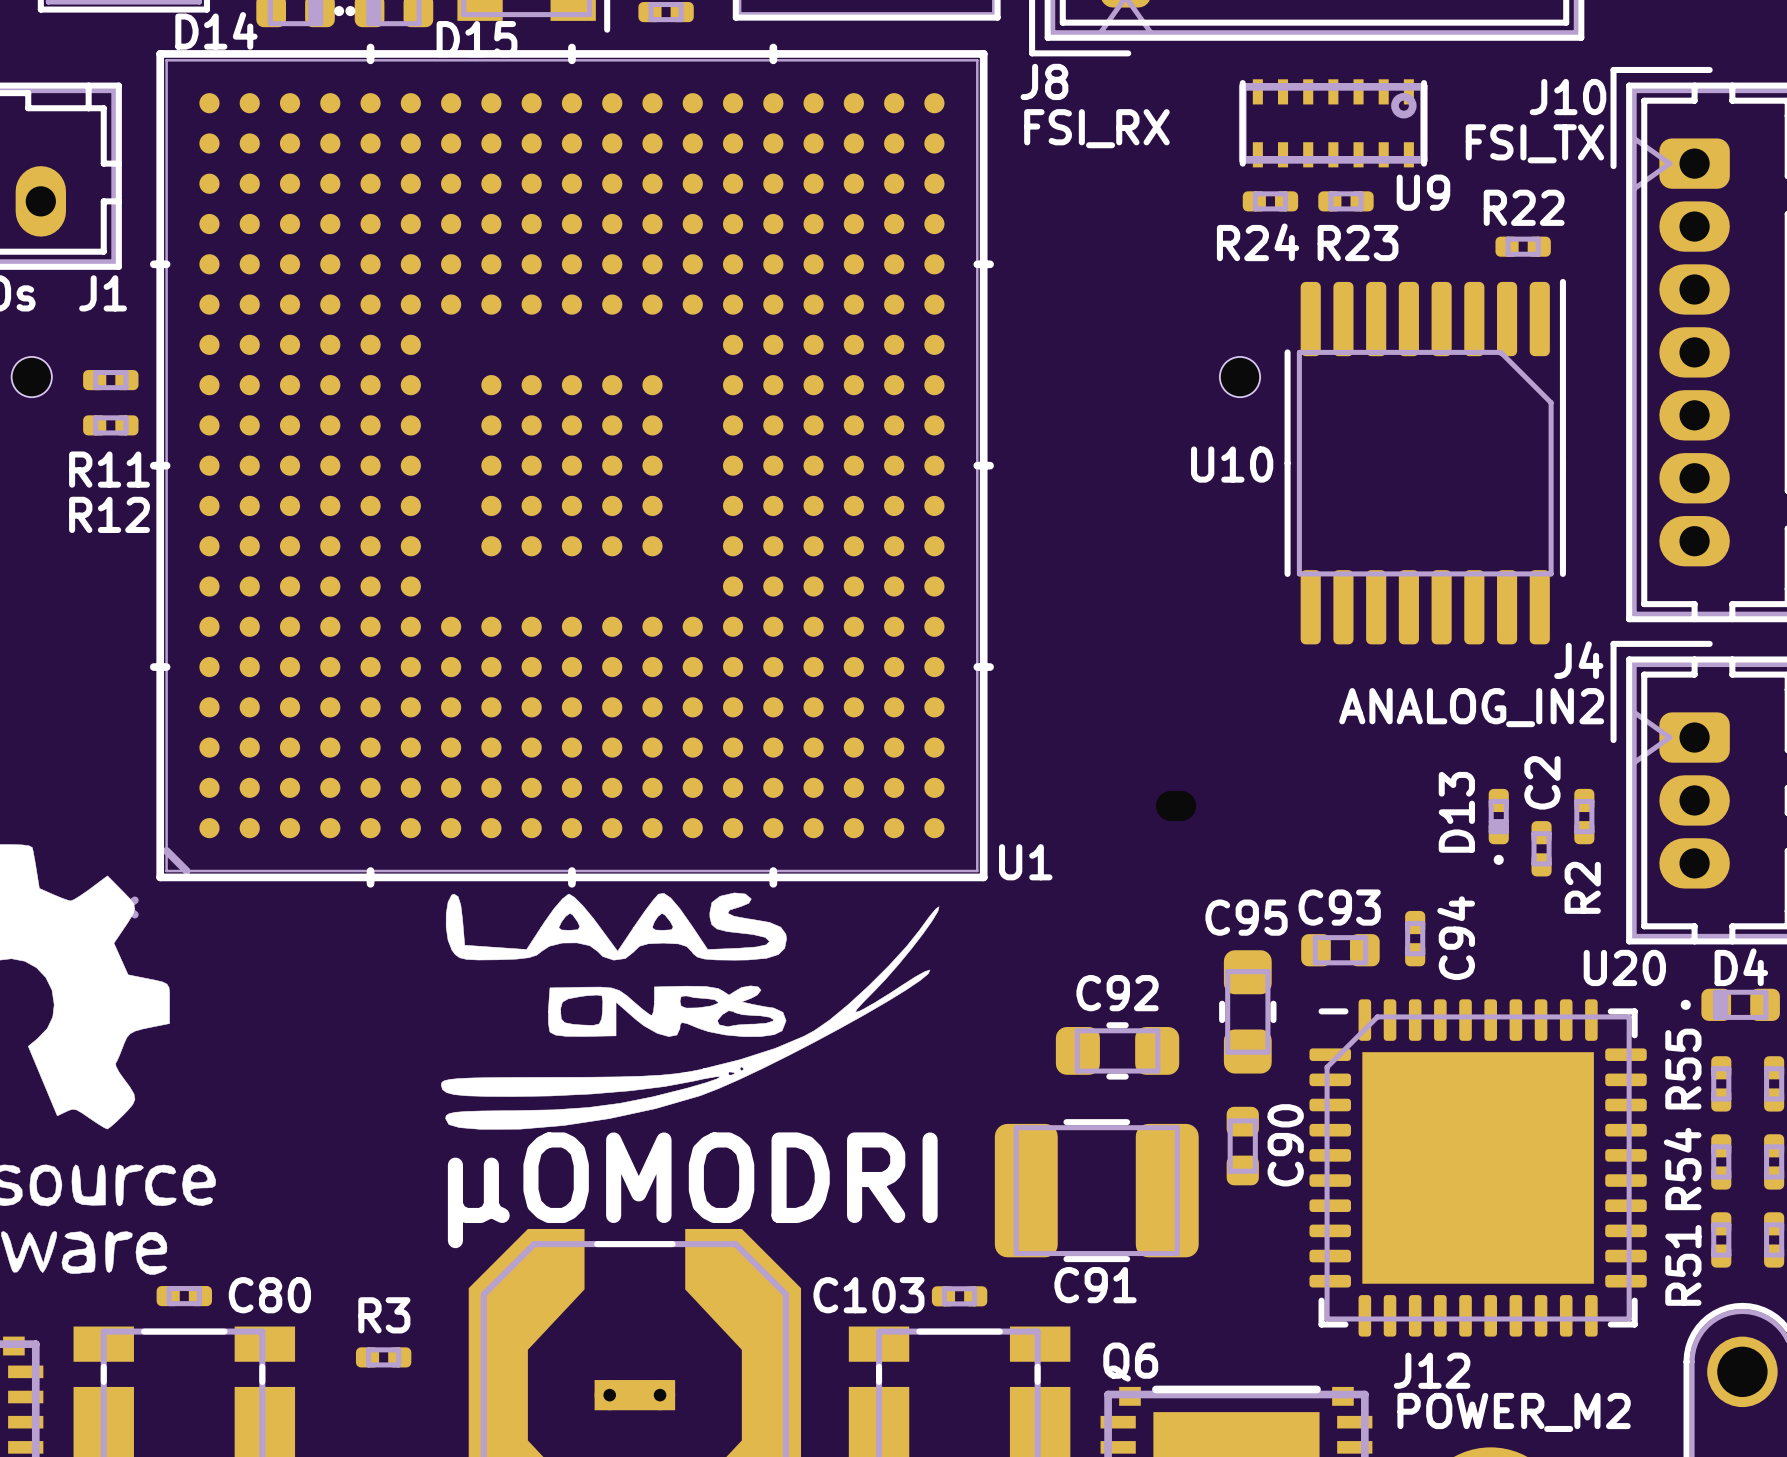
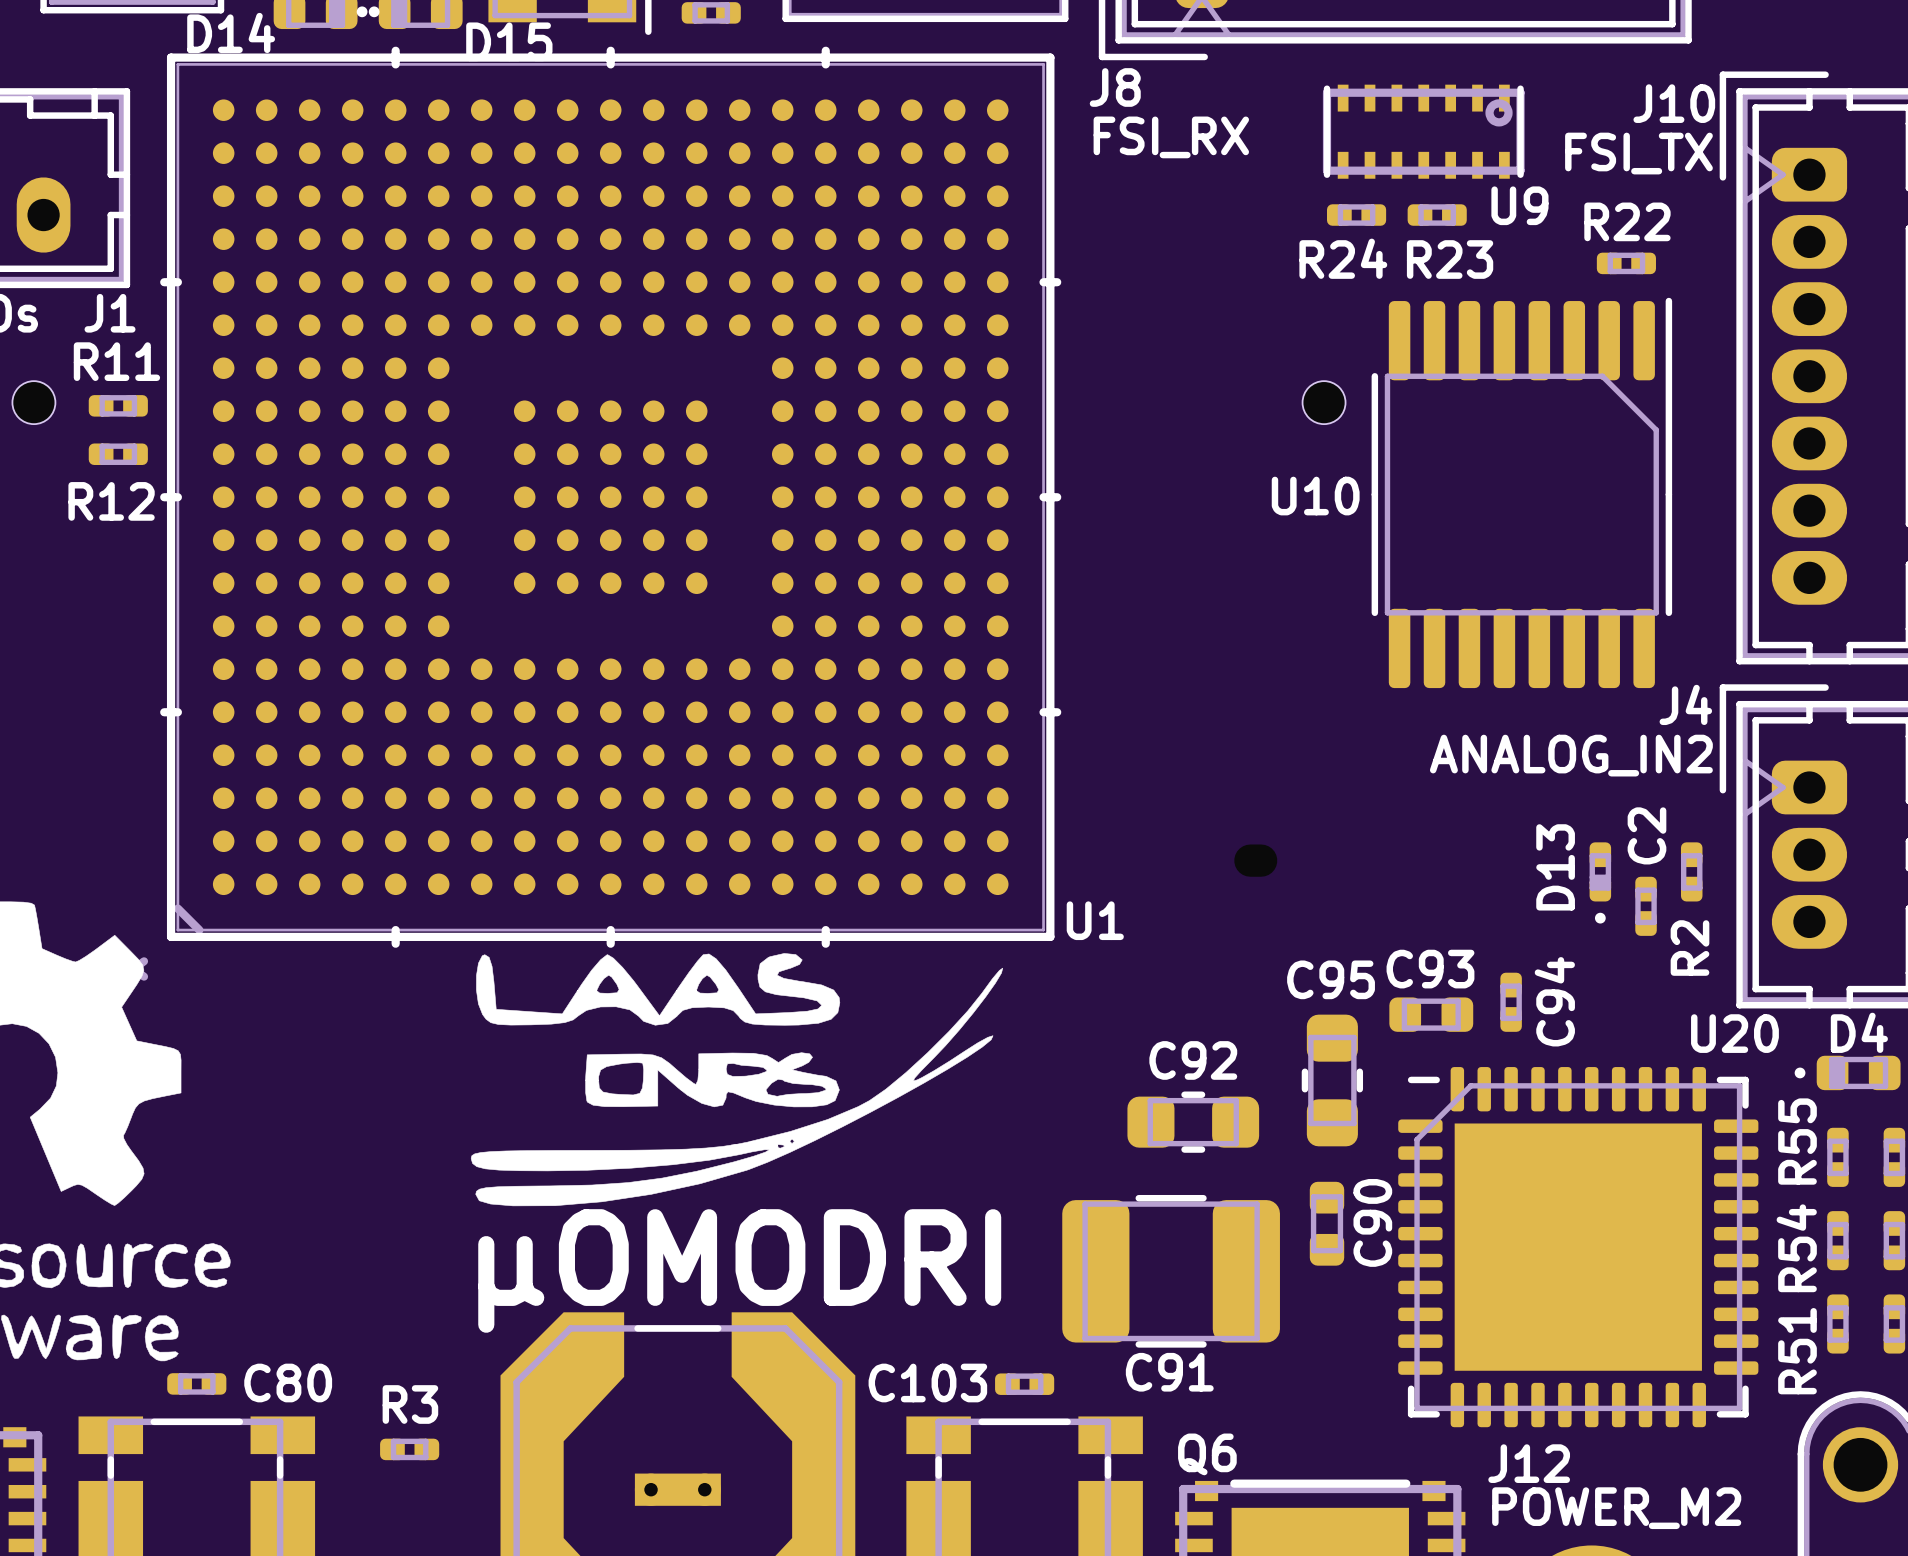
R11 name position: R11 (109, 469) -> R11 (116, 361)
R12 name position: R12 (109, 514) -> R12 (111, 501)

